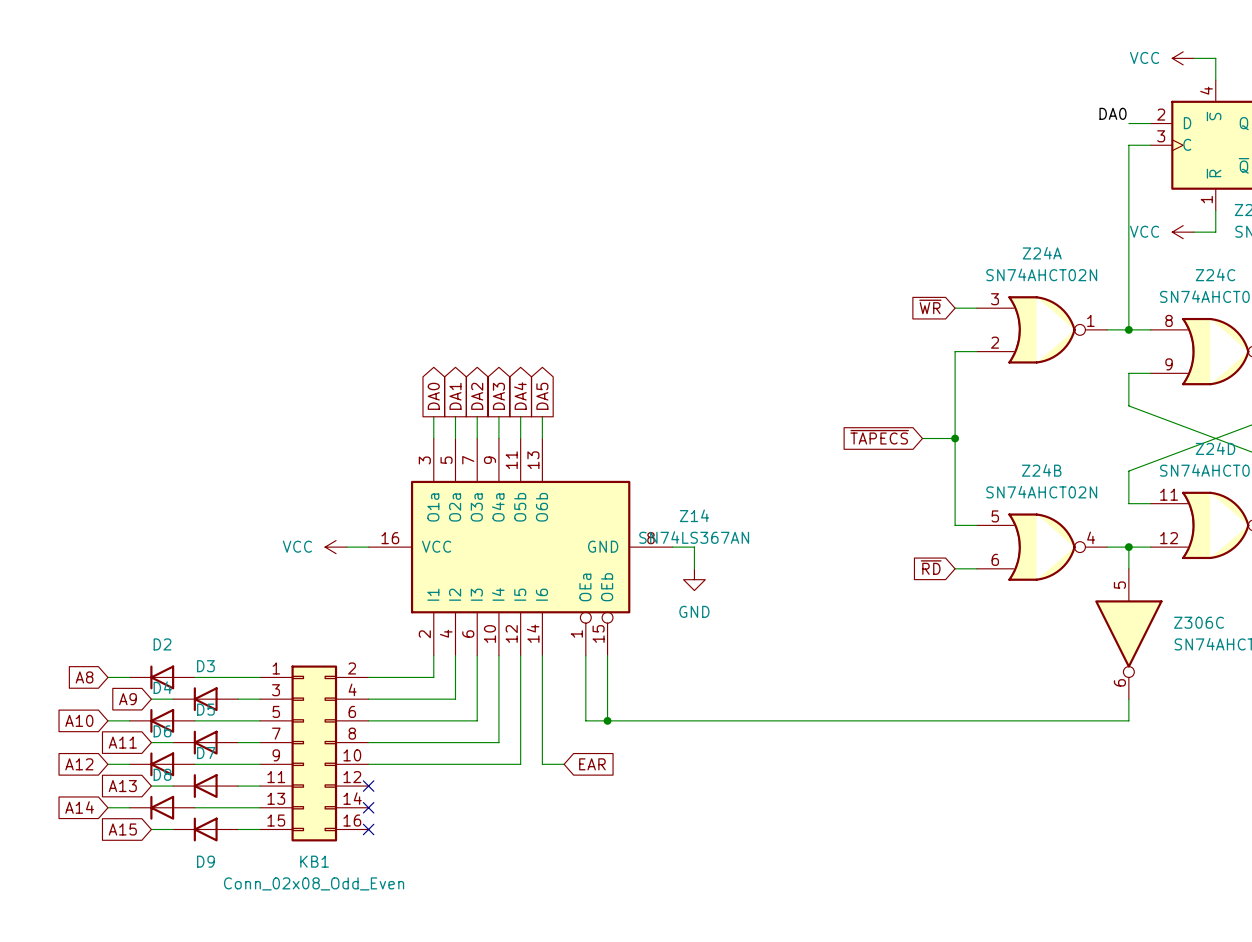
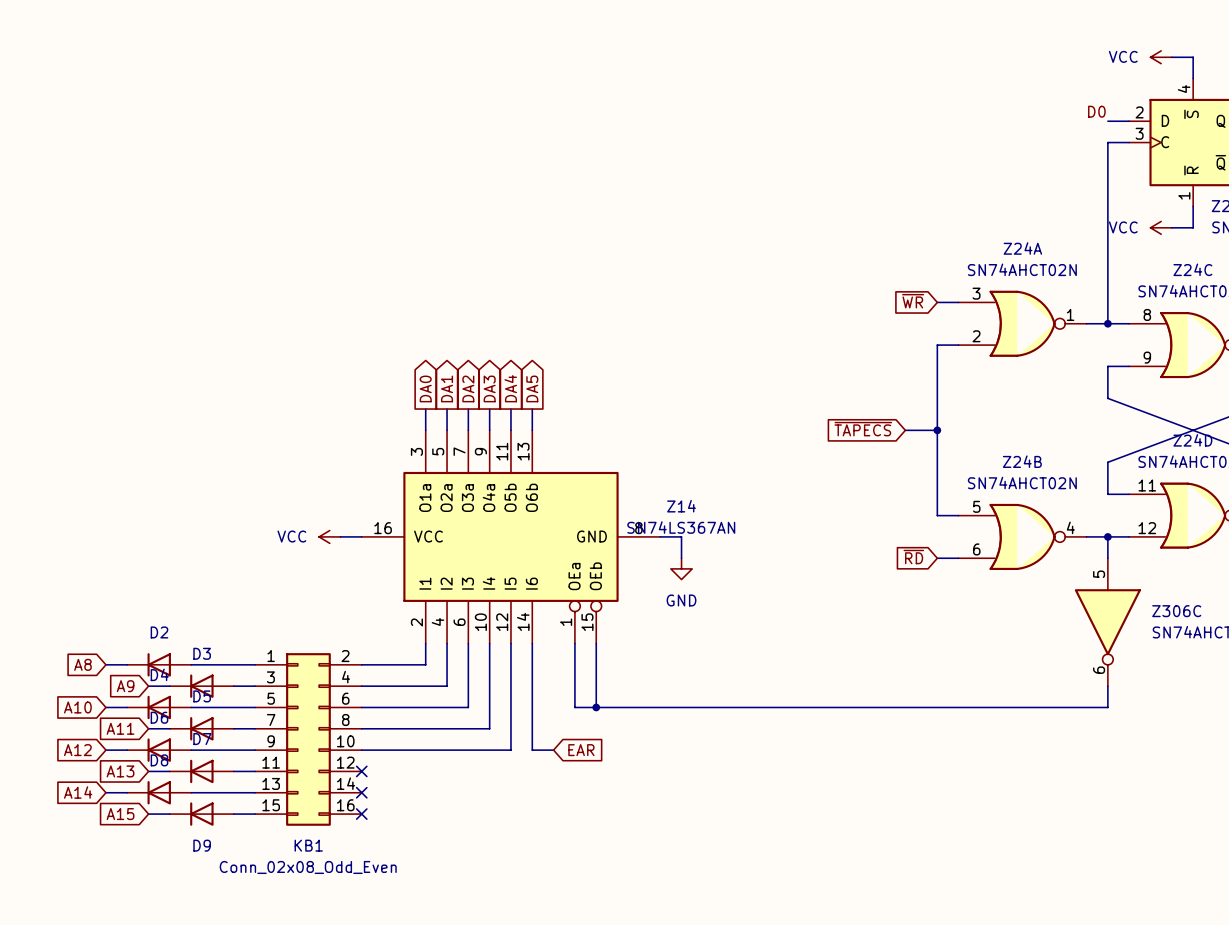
label: DA0 (1113, 113) -> D0 (1096, 111)

